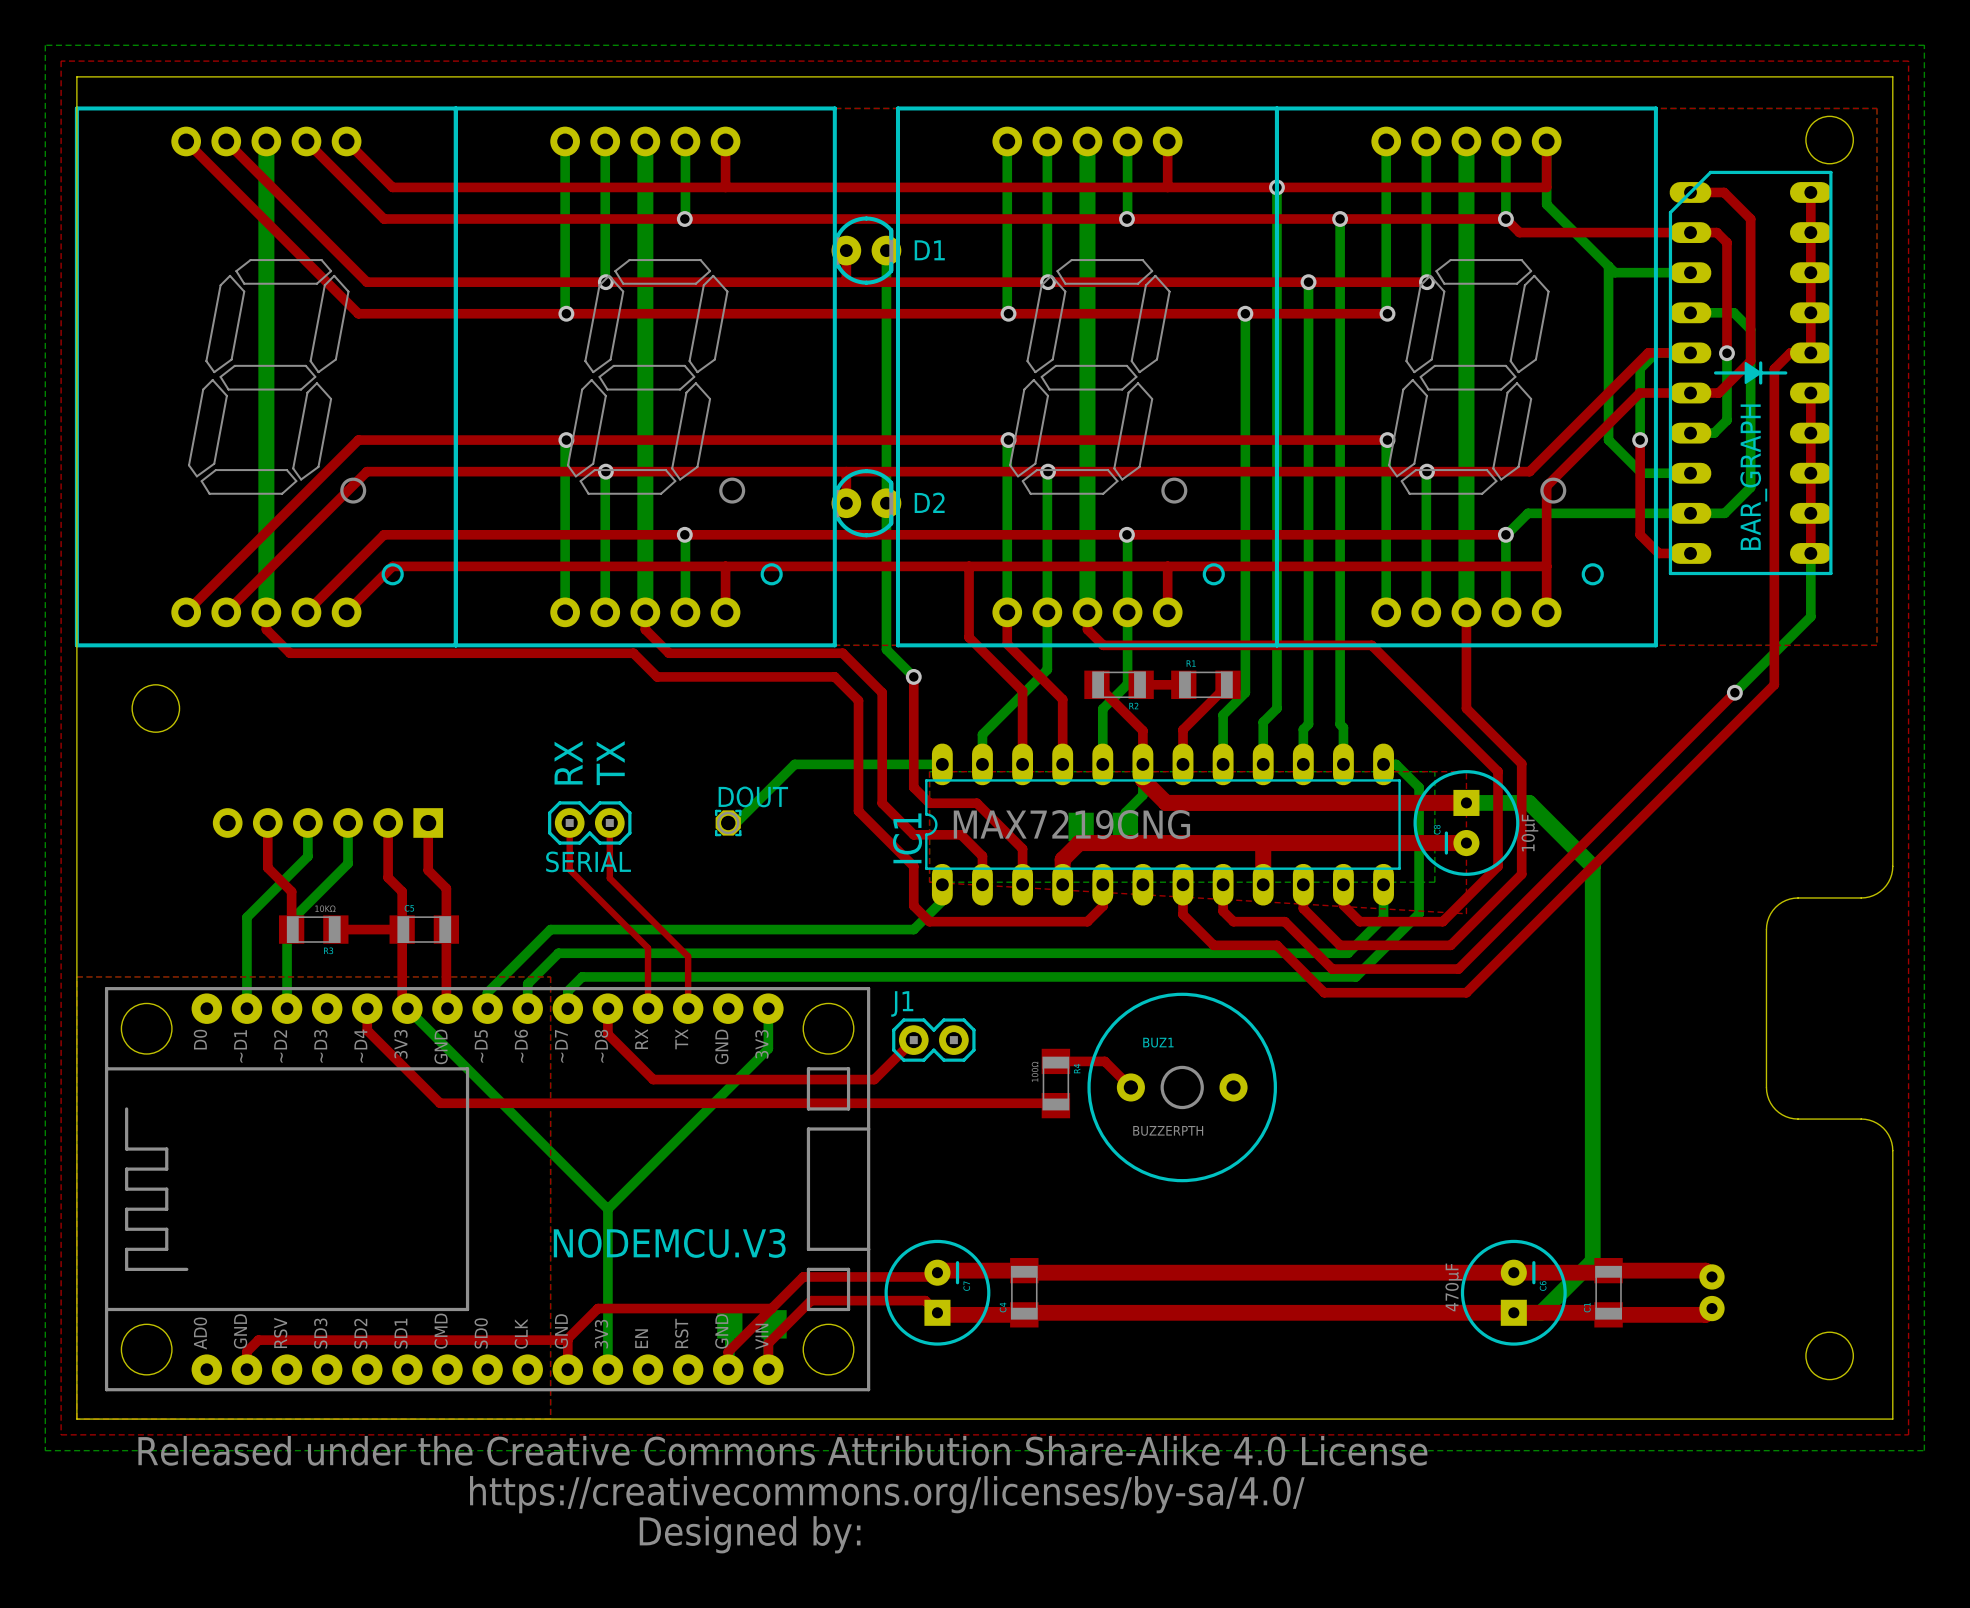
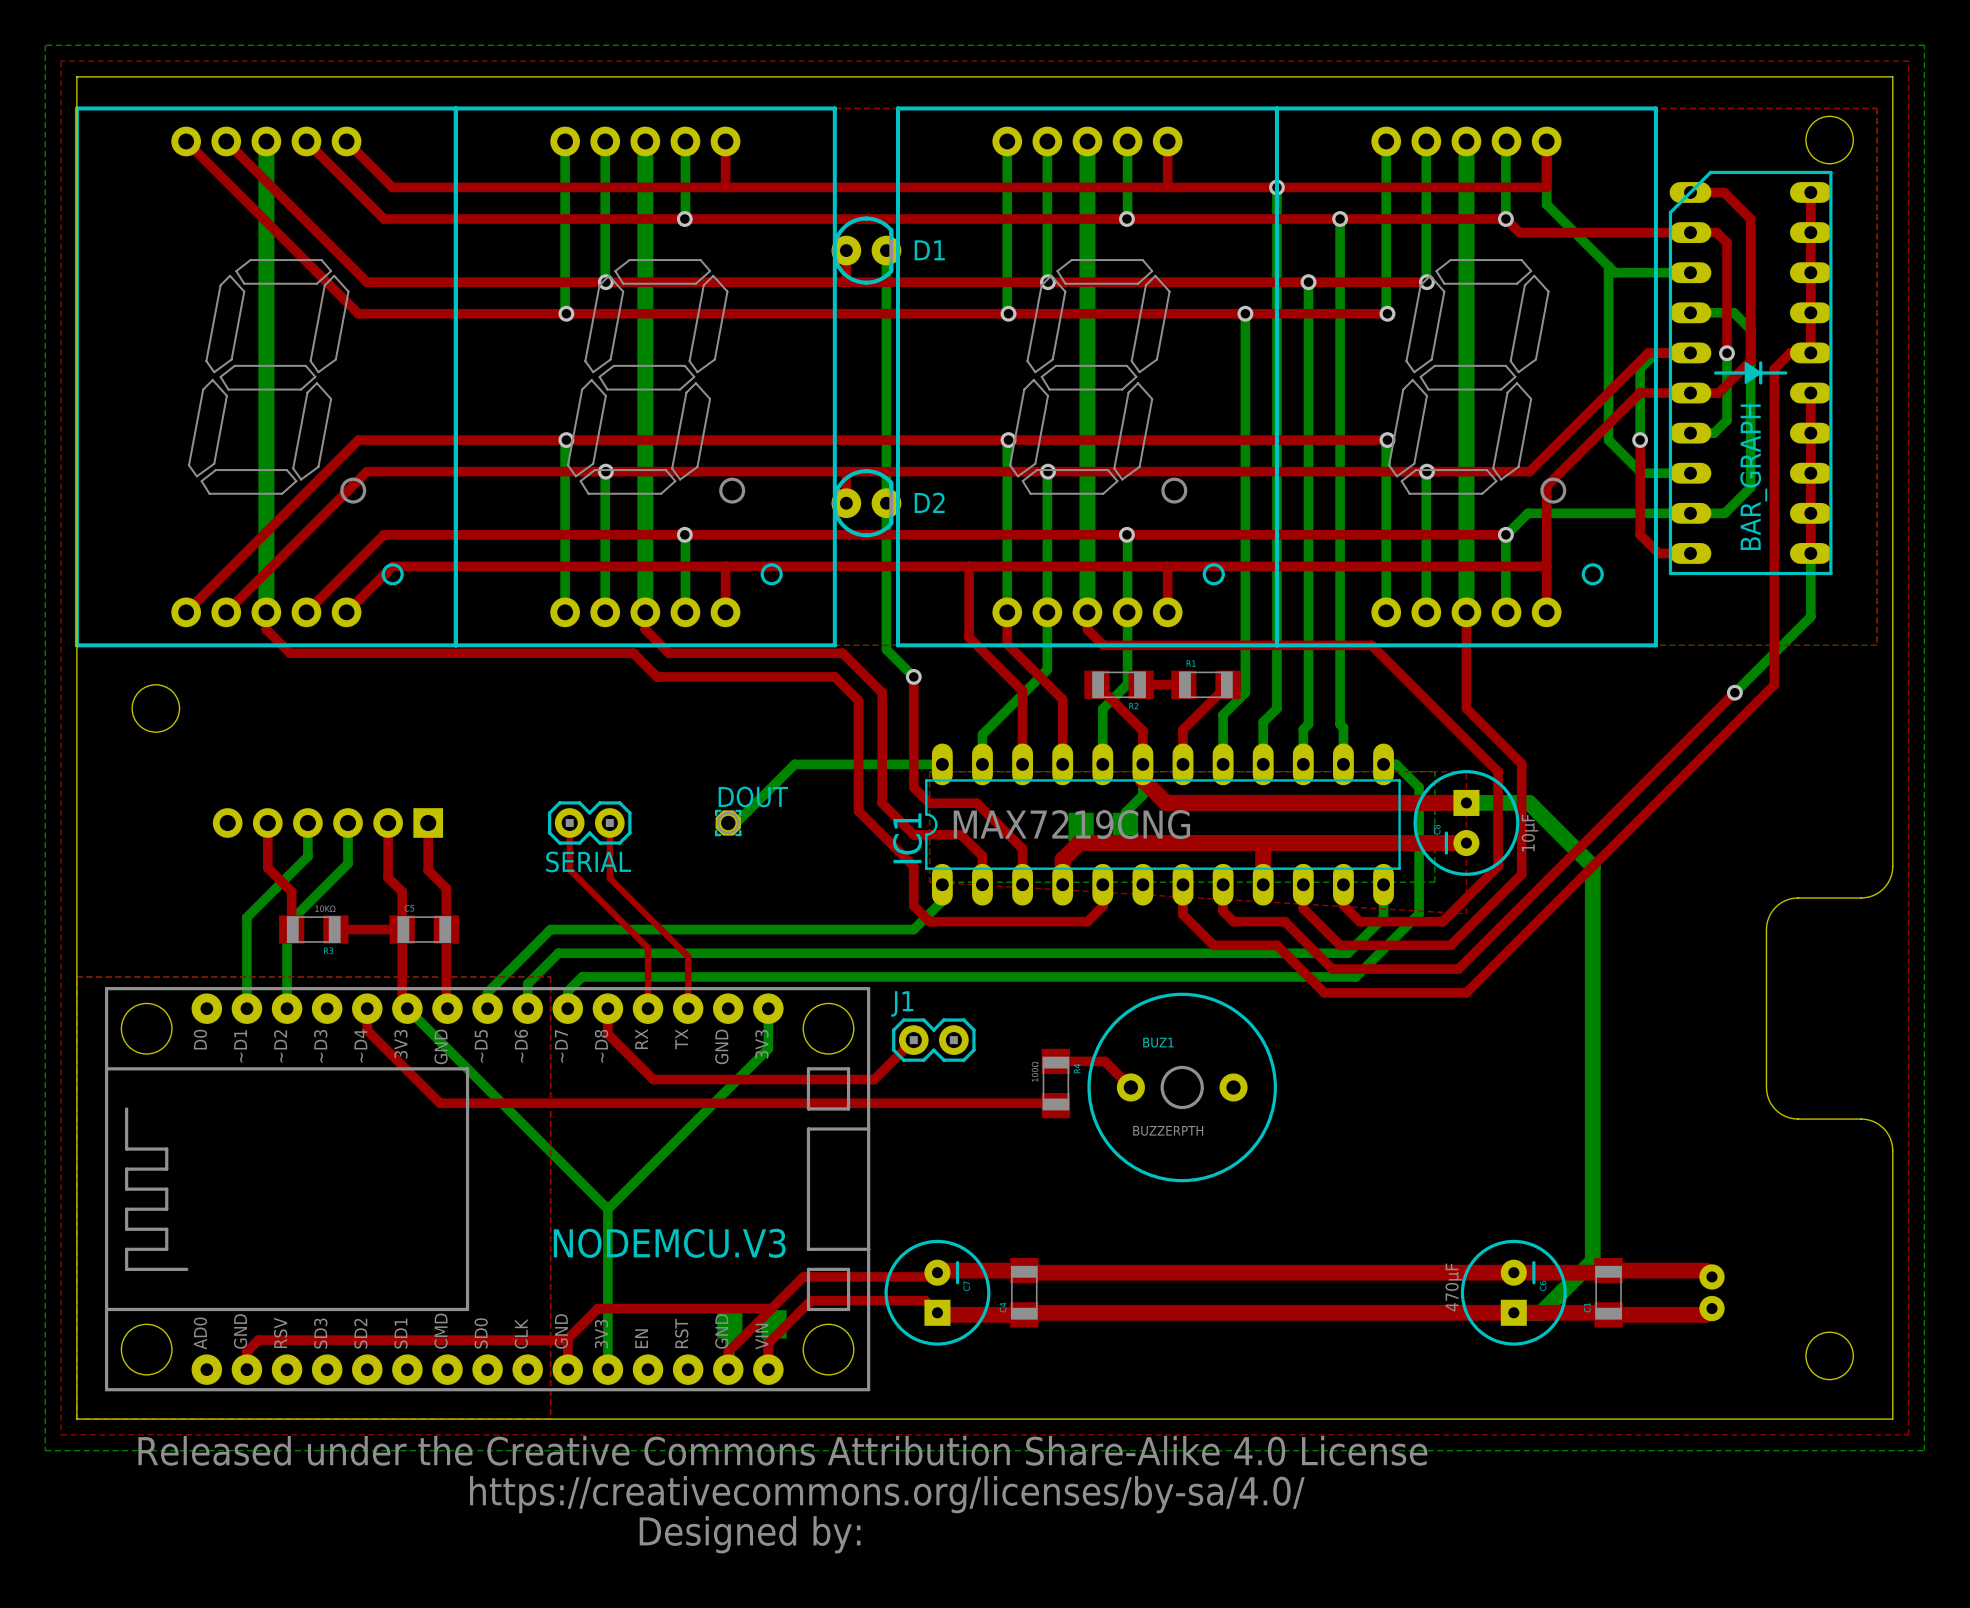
text: RX (568, 762) -> none
text: TX (610, 763) -> none

